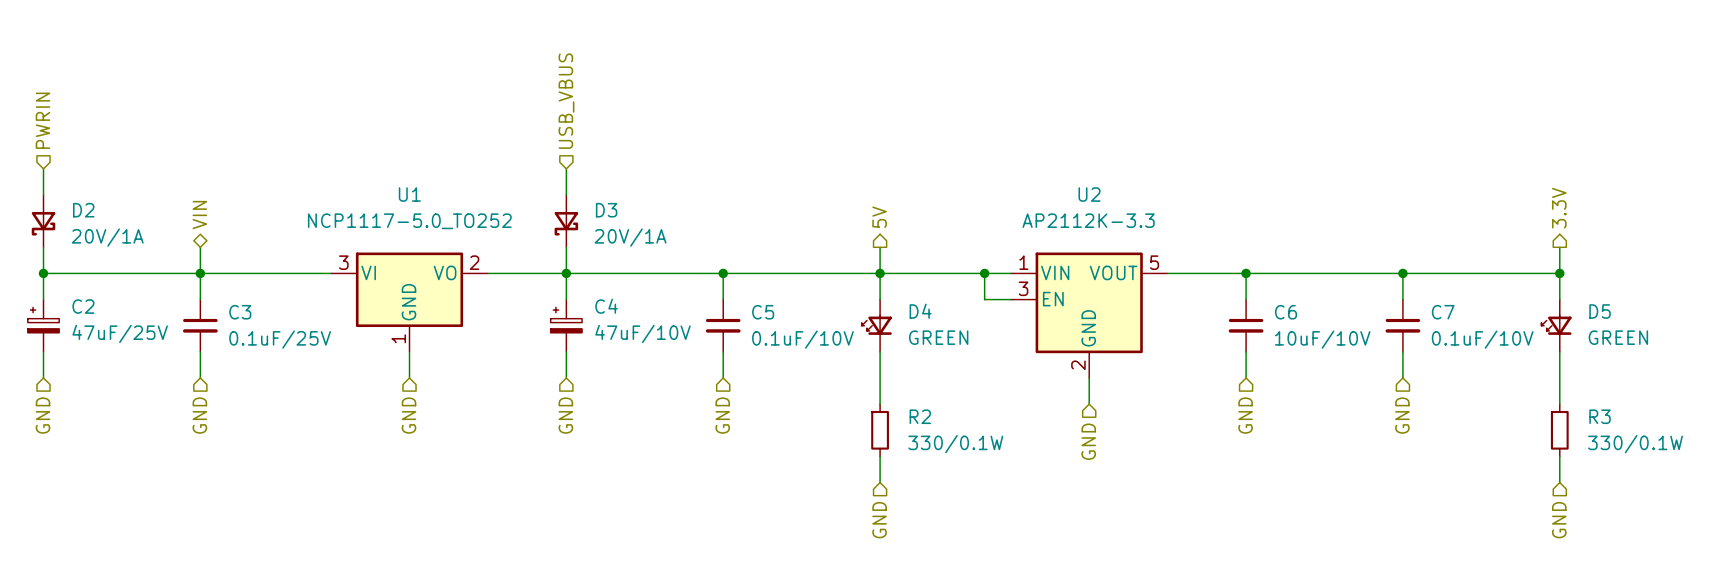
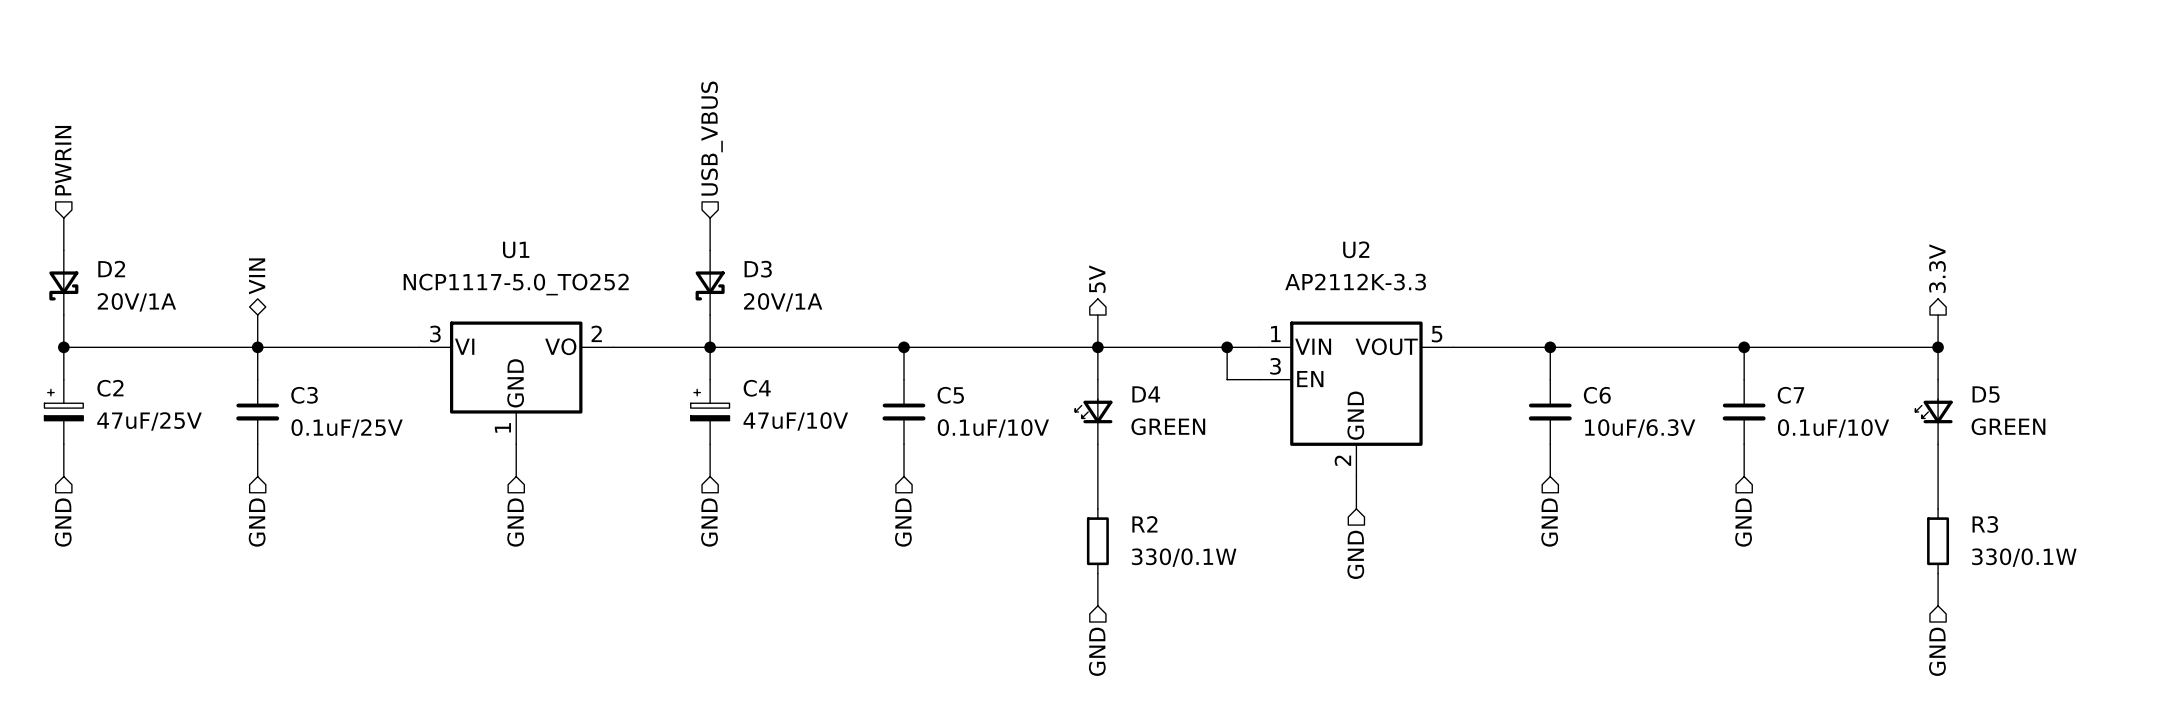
C6 value: 10uF/10V (1322, 339) -> 10uF/6.3V (1640, 428)

